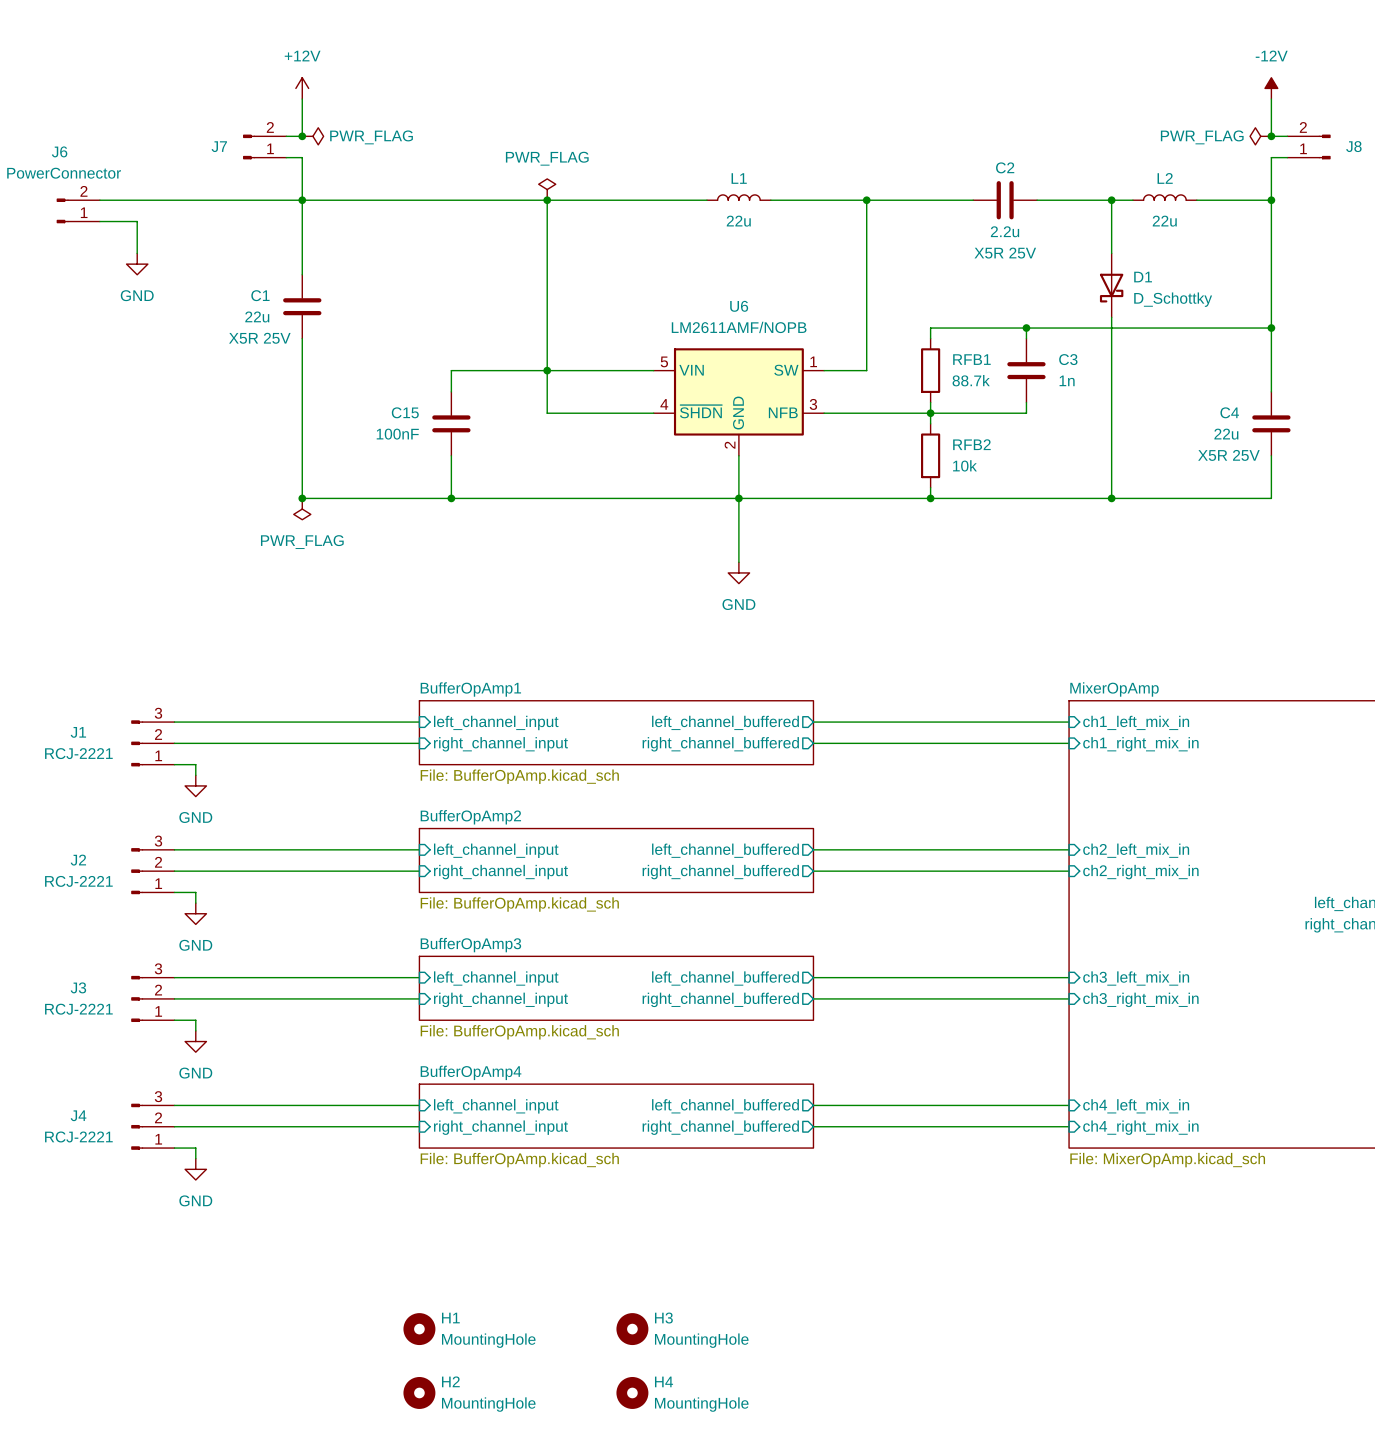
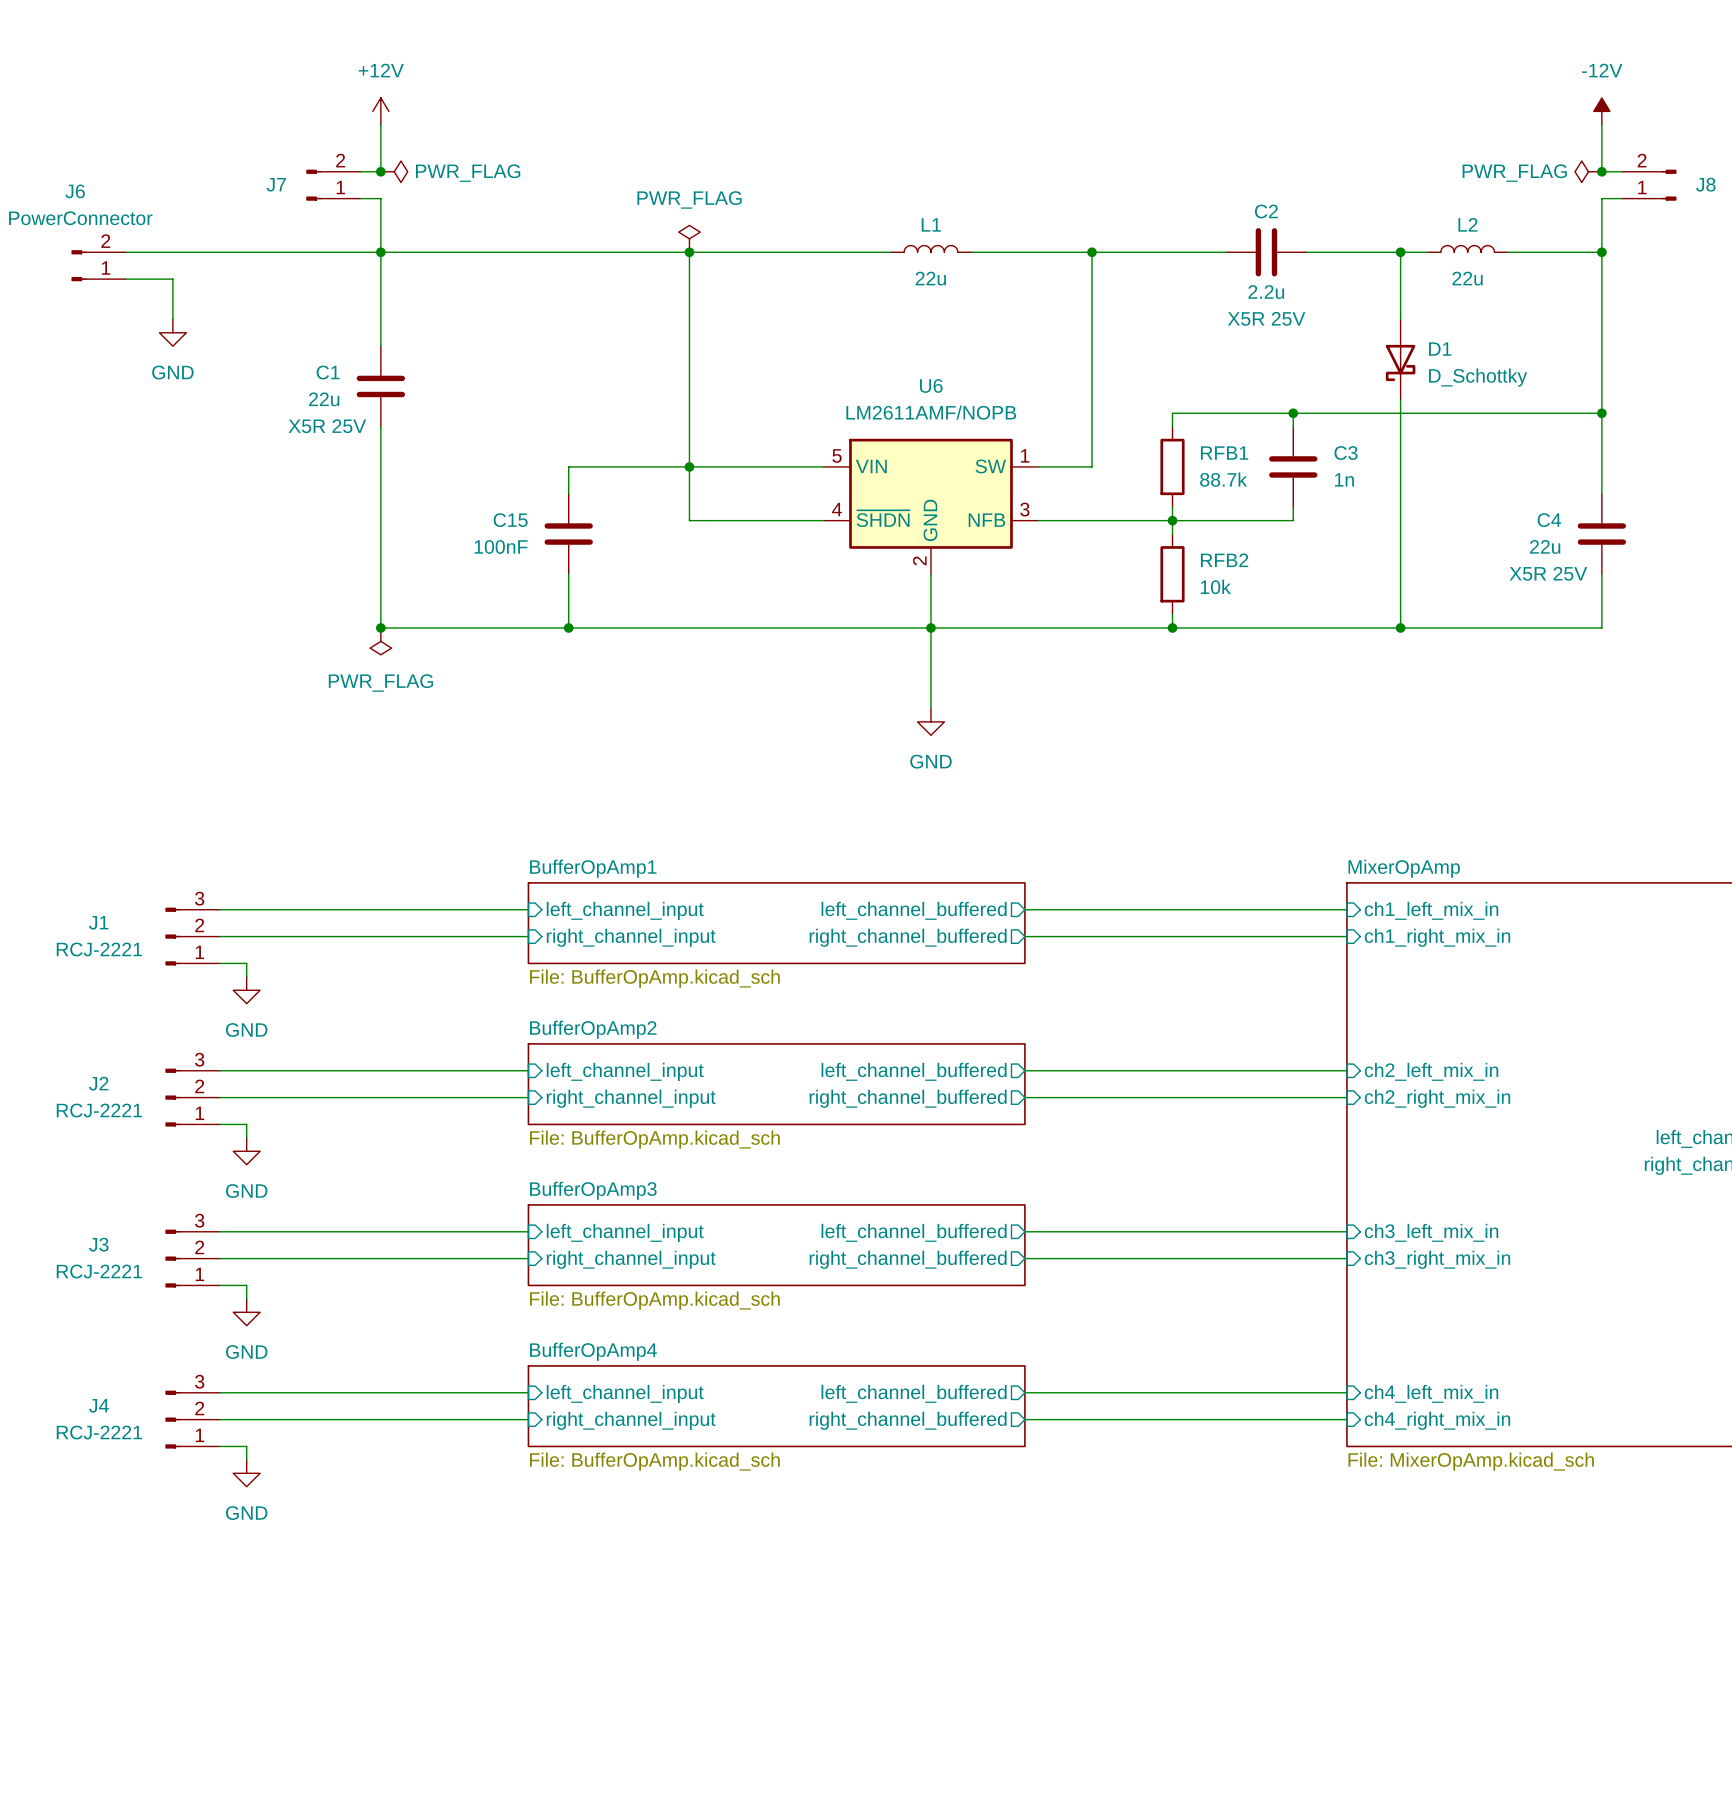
H1: MountingHole (419, 1329) -> none
H3: MountingHole (632, 1329) -> none
H2: MountingHole (419, 1392) -> none
H4: MountingHole (632, 1392) -> none

